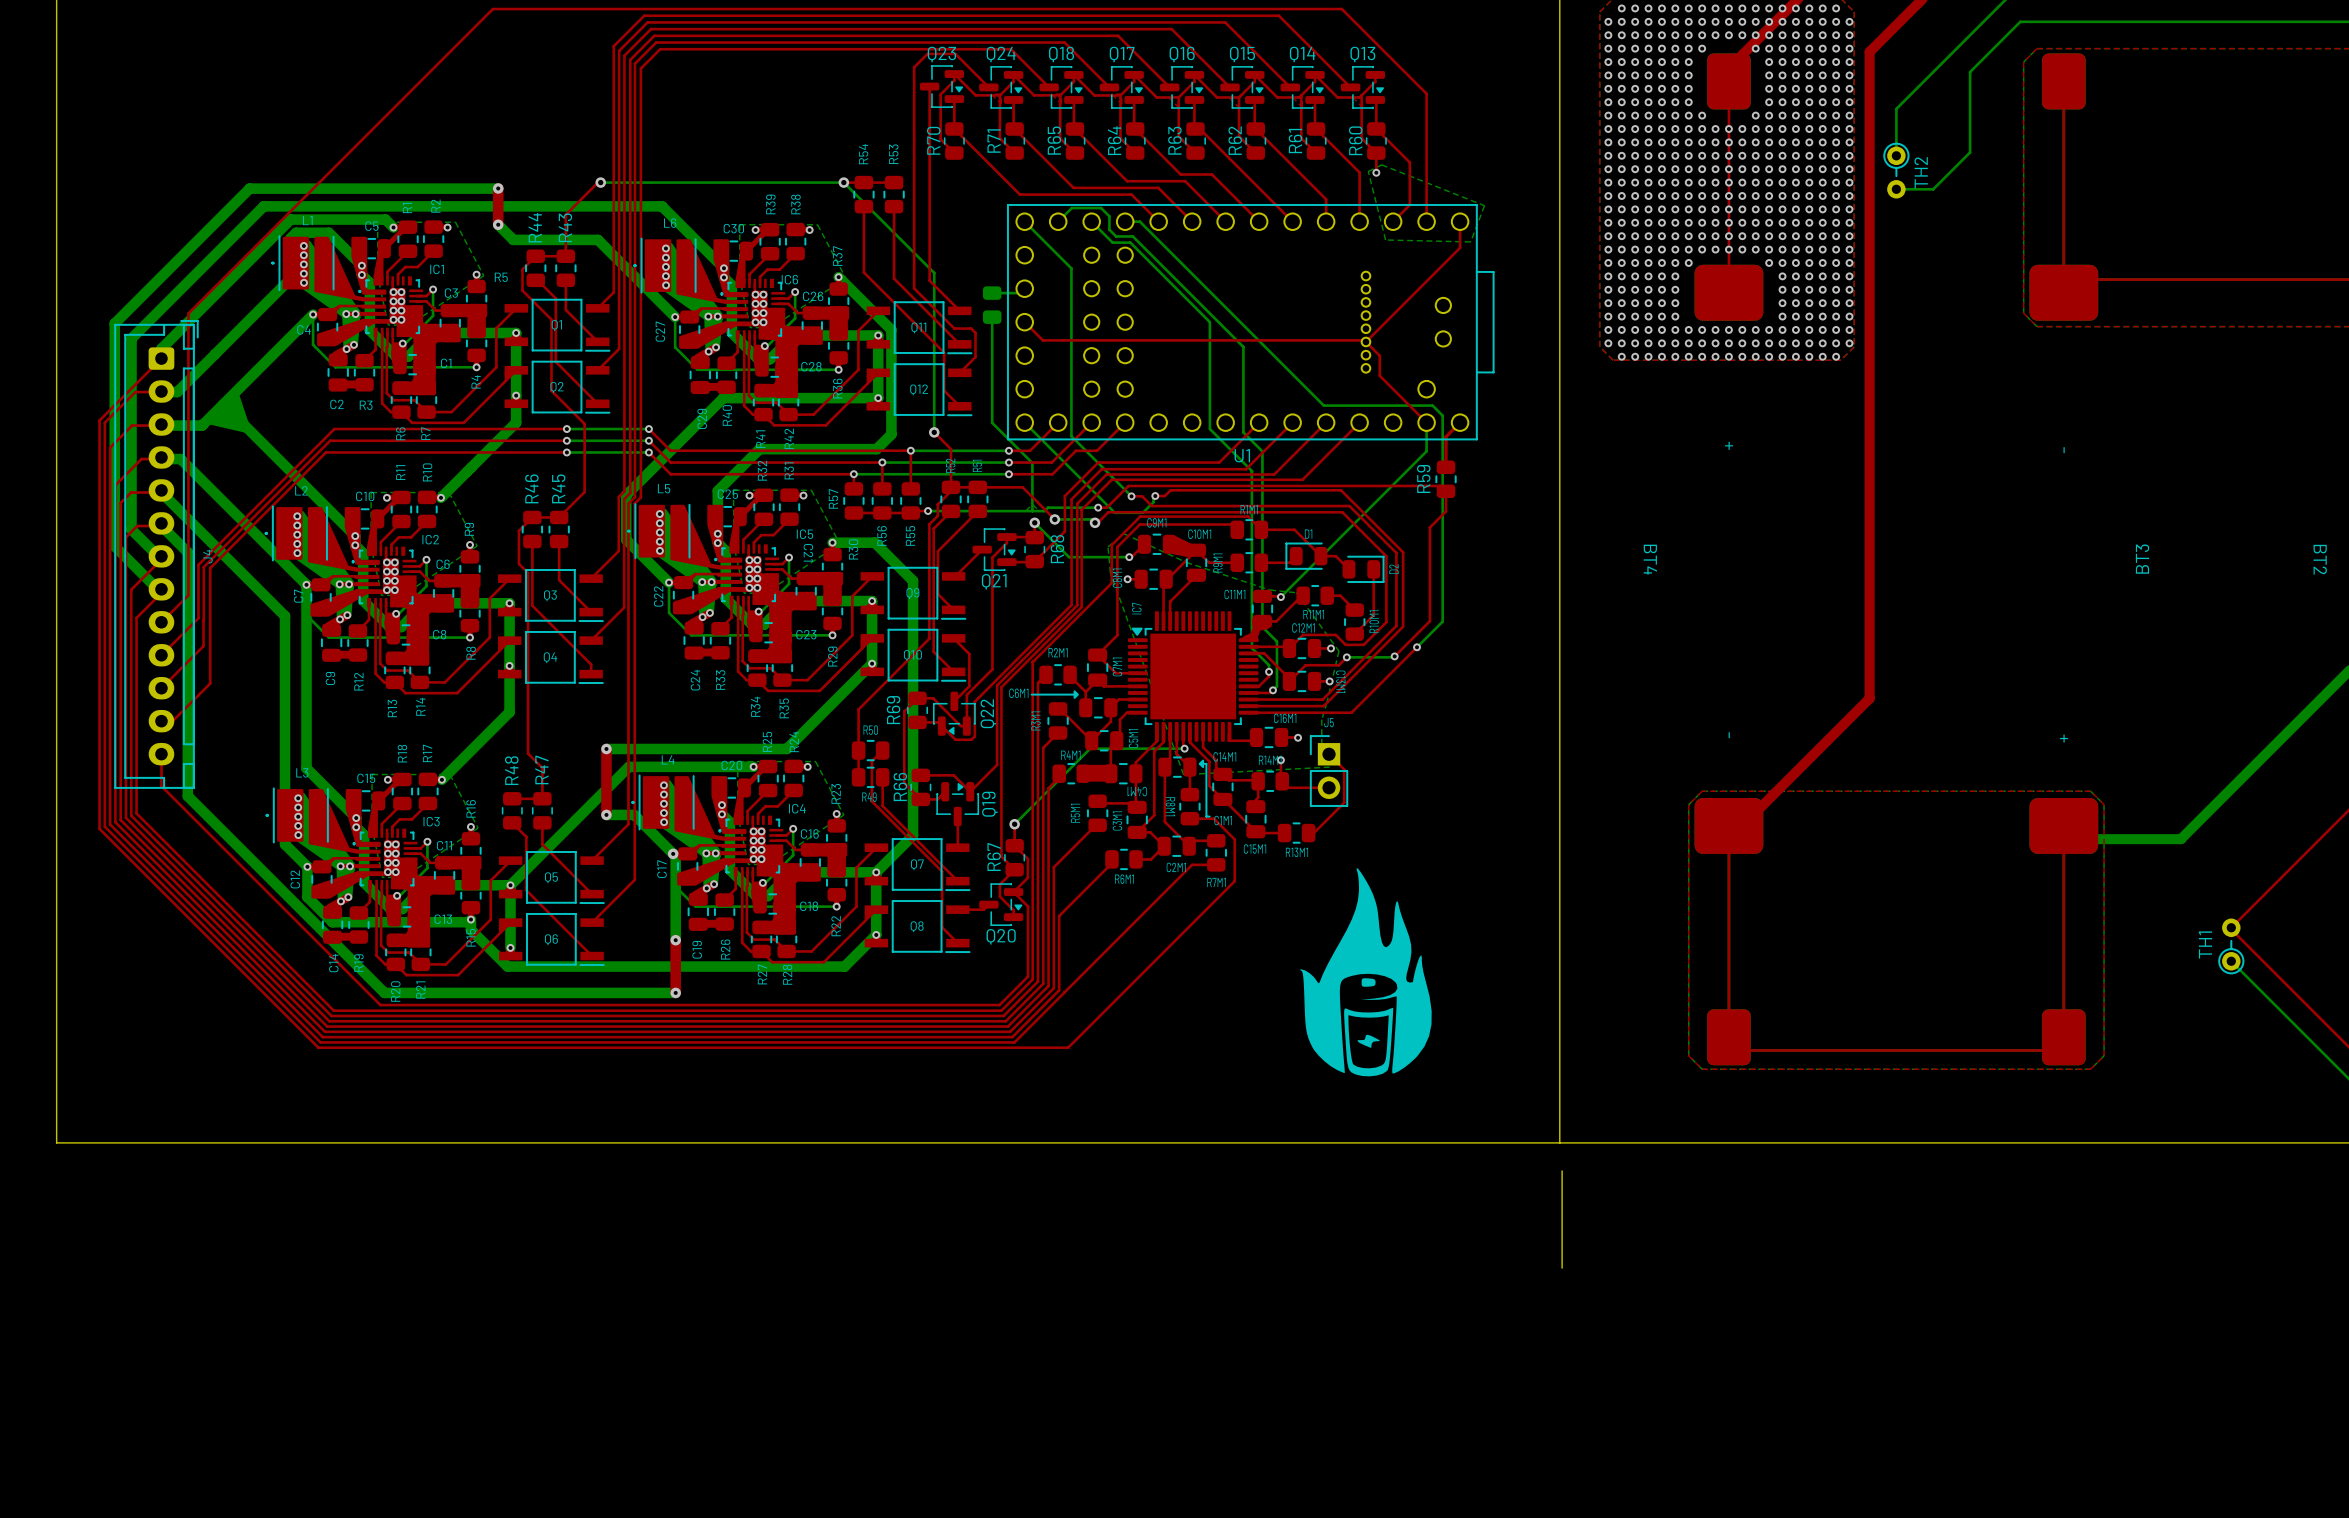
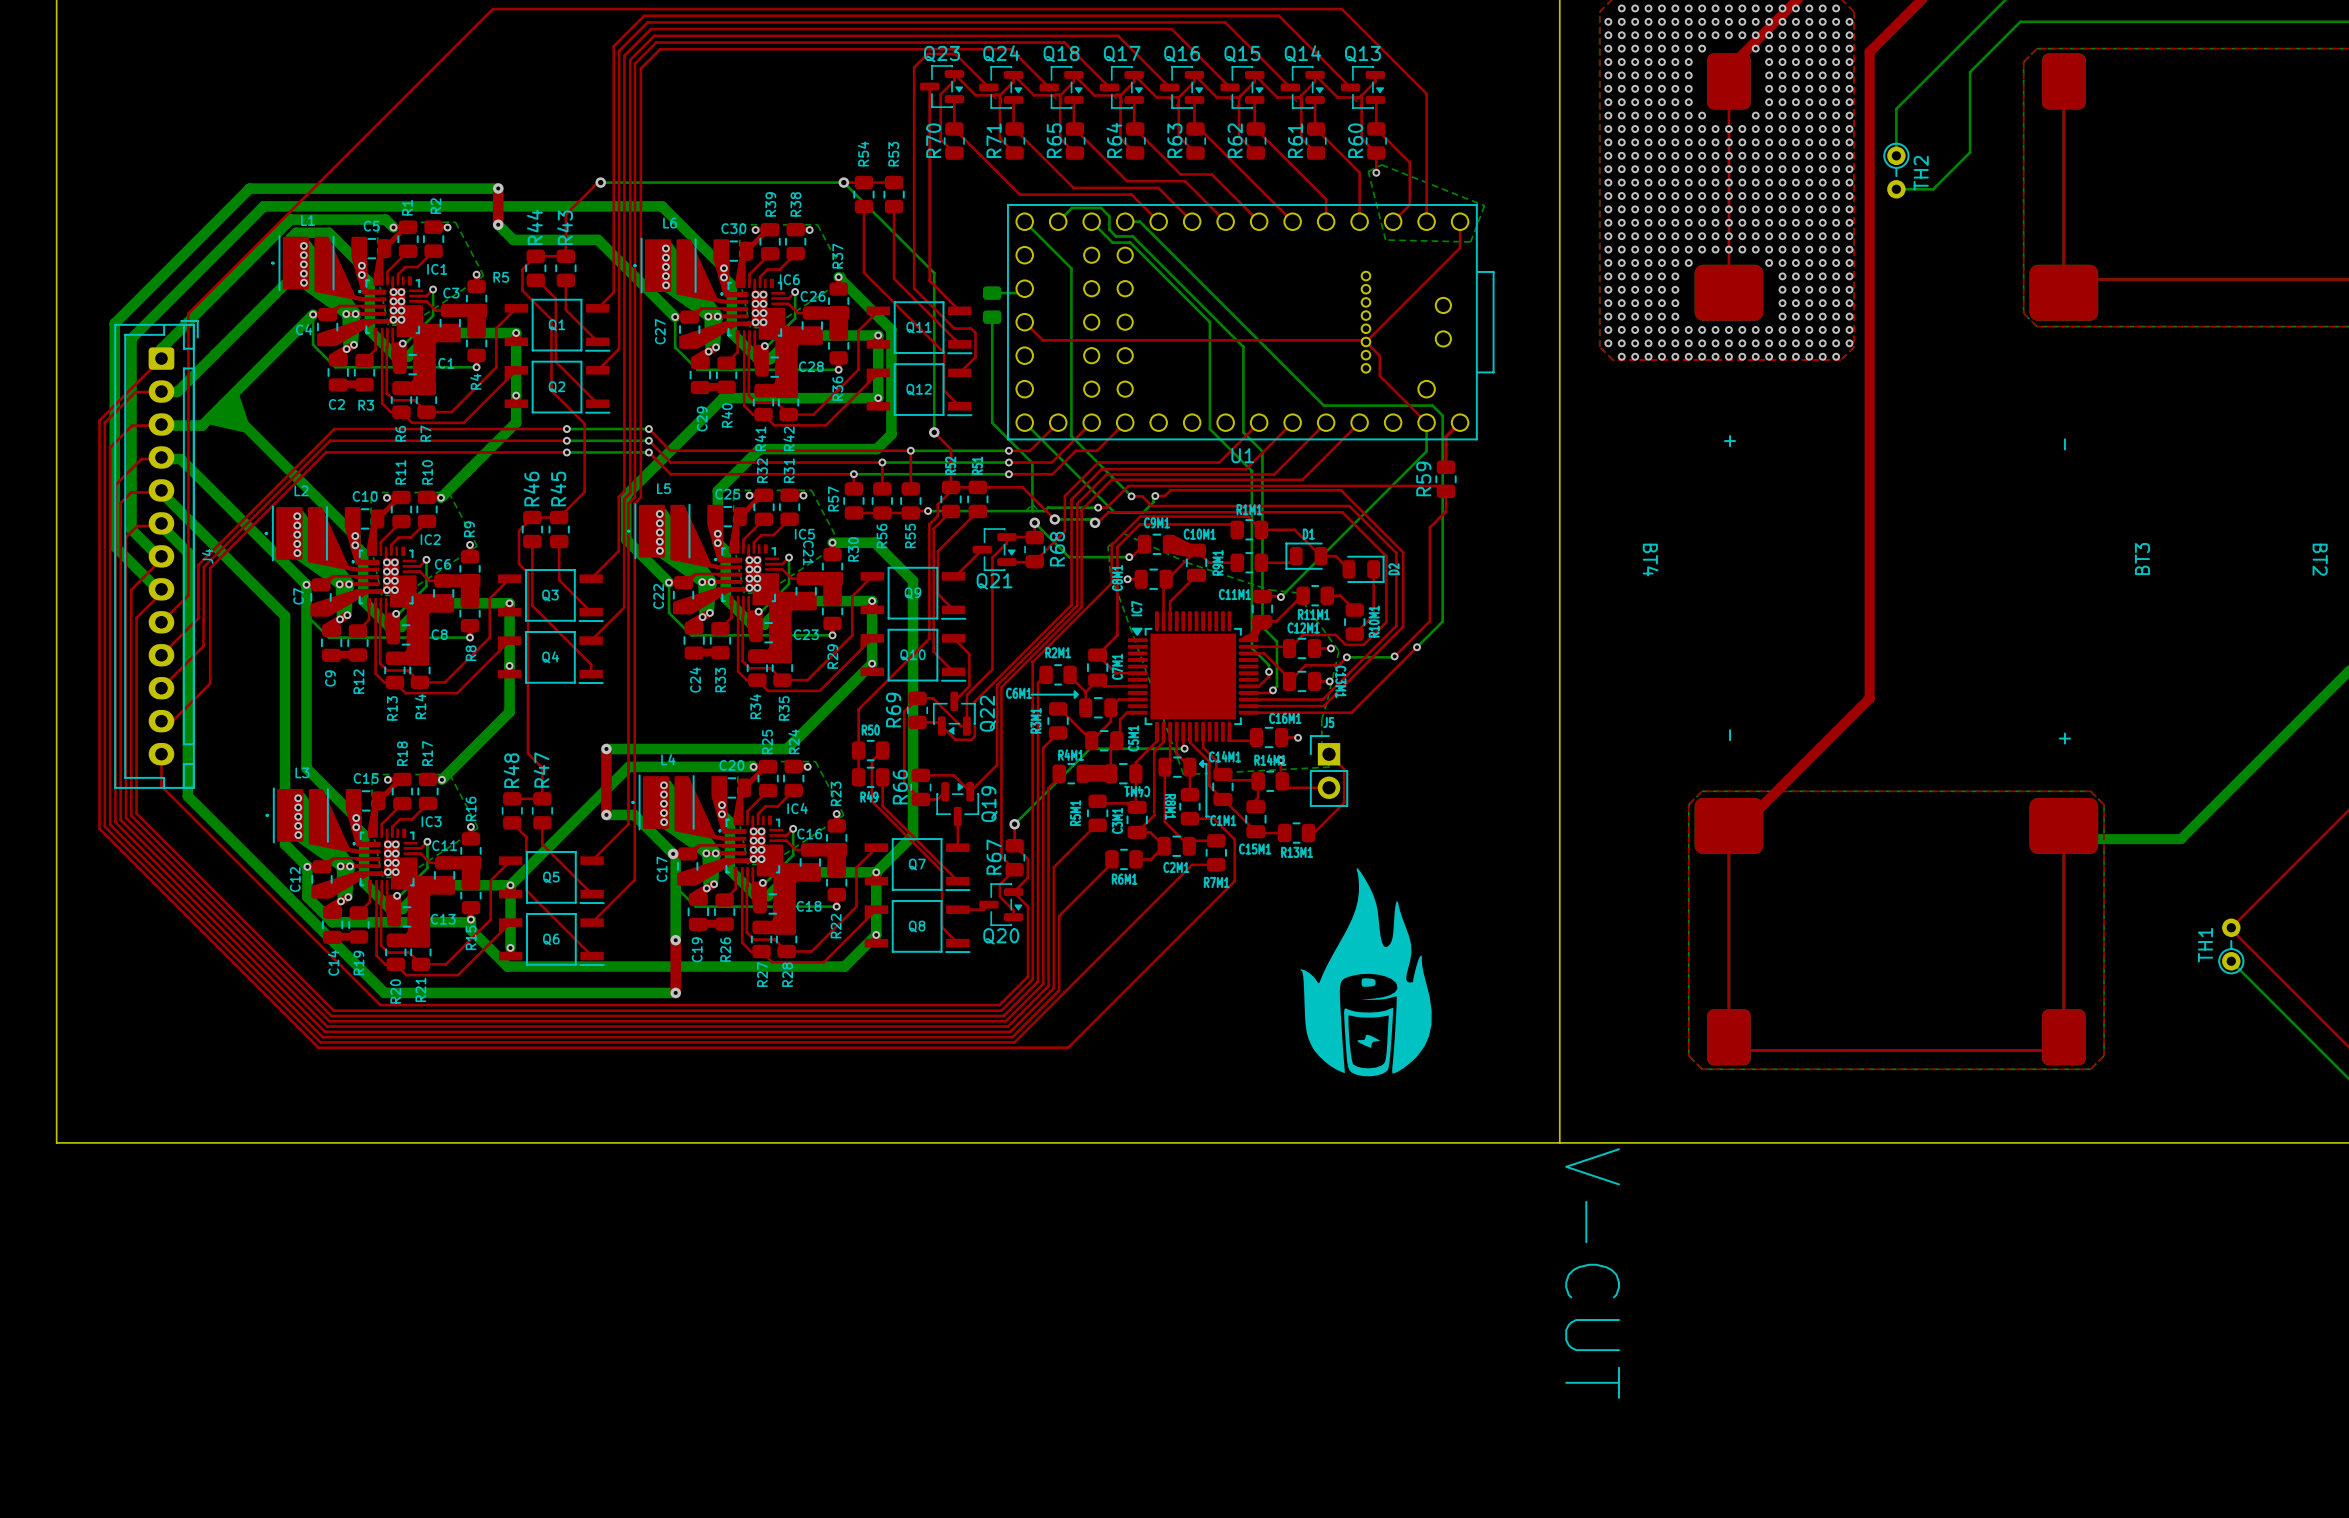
board edge: (1562, 1170) (1562, 1268) -> none
text: none -> V-CUT (1592, 1273)

